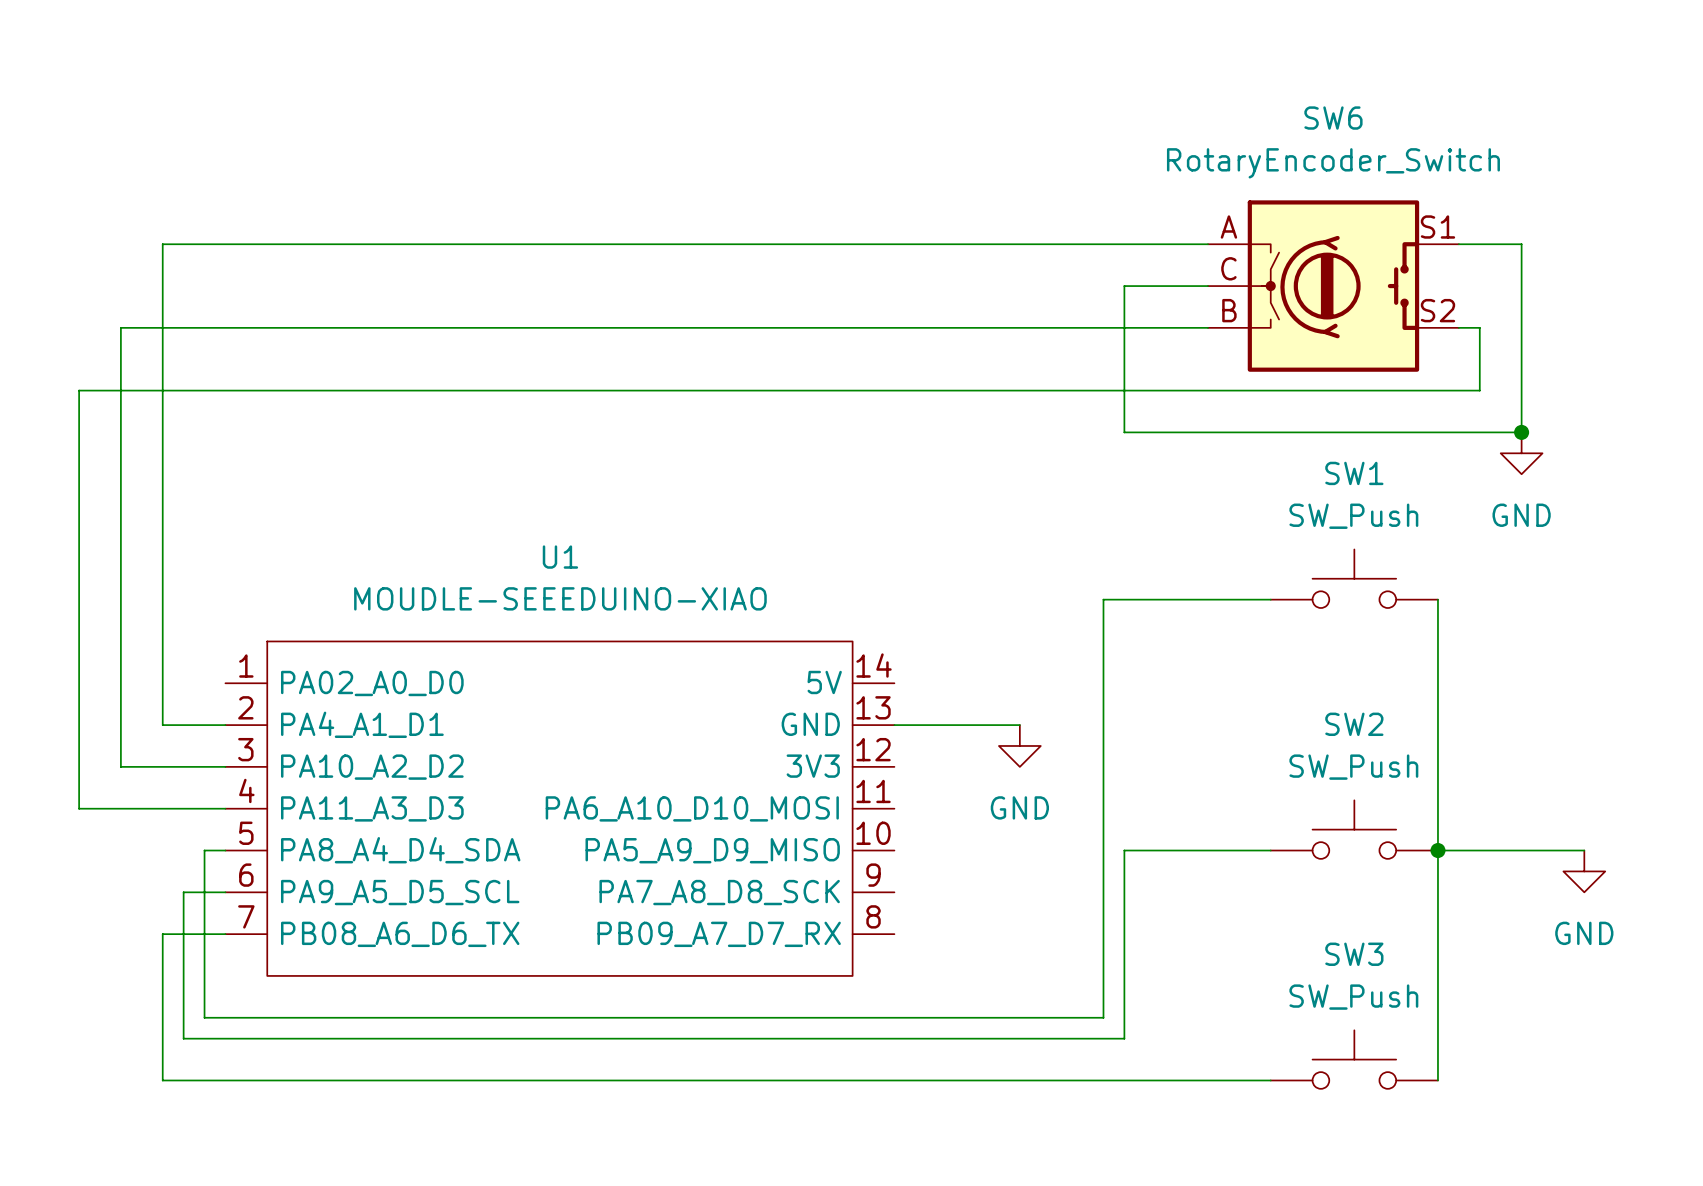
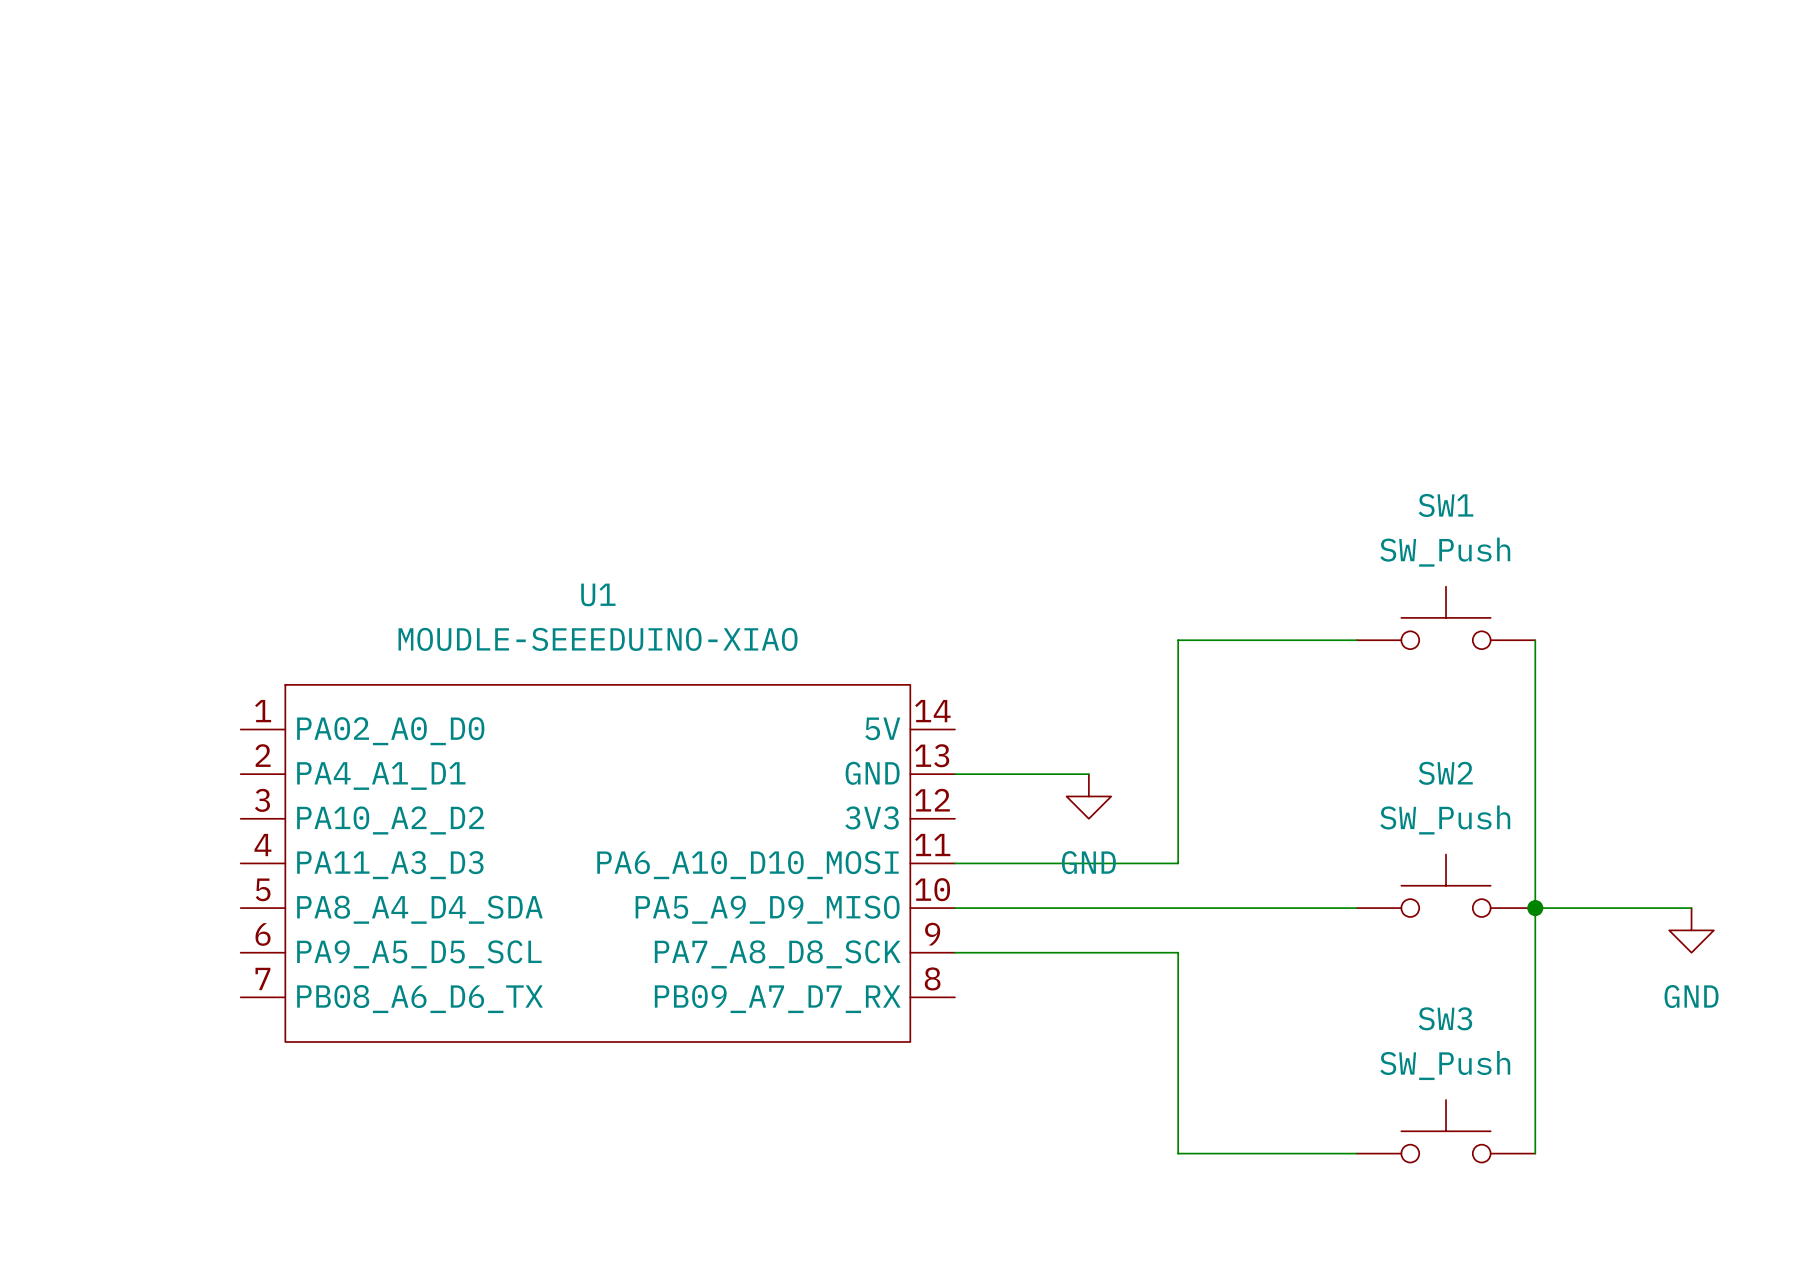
wire: (1208, 244) (162, 244) (162, 725) (225, 725) -> none
wire: (1458, 244) (1521, 244) (1521, 432) (1124, 432) (1124, 286) (1208, 286) -> none
SW6: RotaryEncoder_Switch (1333, 286) -> none
wire: (1208, 327) (120, 327) (120, 766) (225, 766) -> none
wire: (1458, 327) (1479, 327) (1479, 390) (79, 390) (79, 808) (225, 808) -> none
junction: (1521, 432) -> none
power symbol: GND (1521, 453) -> none
wire: (1103, 808) (1103, 892) -> (1178, 863) (954, 863)
wire: (225, 850) (204, 850) (204, 1017) (1103, 1017) -> none
wire: (1124, 850) (1124, 1038) (183, 1038) (183, 892) (225, 892) -> (1200, 908) (954, 908)
wire: none -> (954, 952) (1178, 952)
wire: (225, 934) (162, 934) (162, 1080) (1103, 1080) -> (1178, 1086) (1178, 1153)

